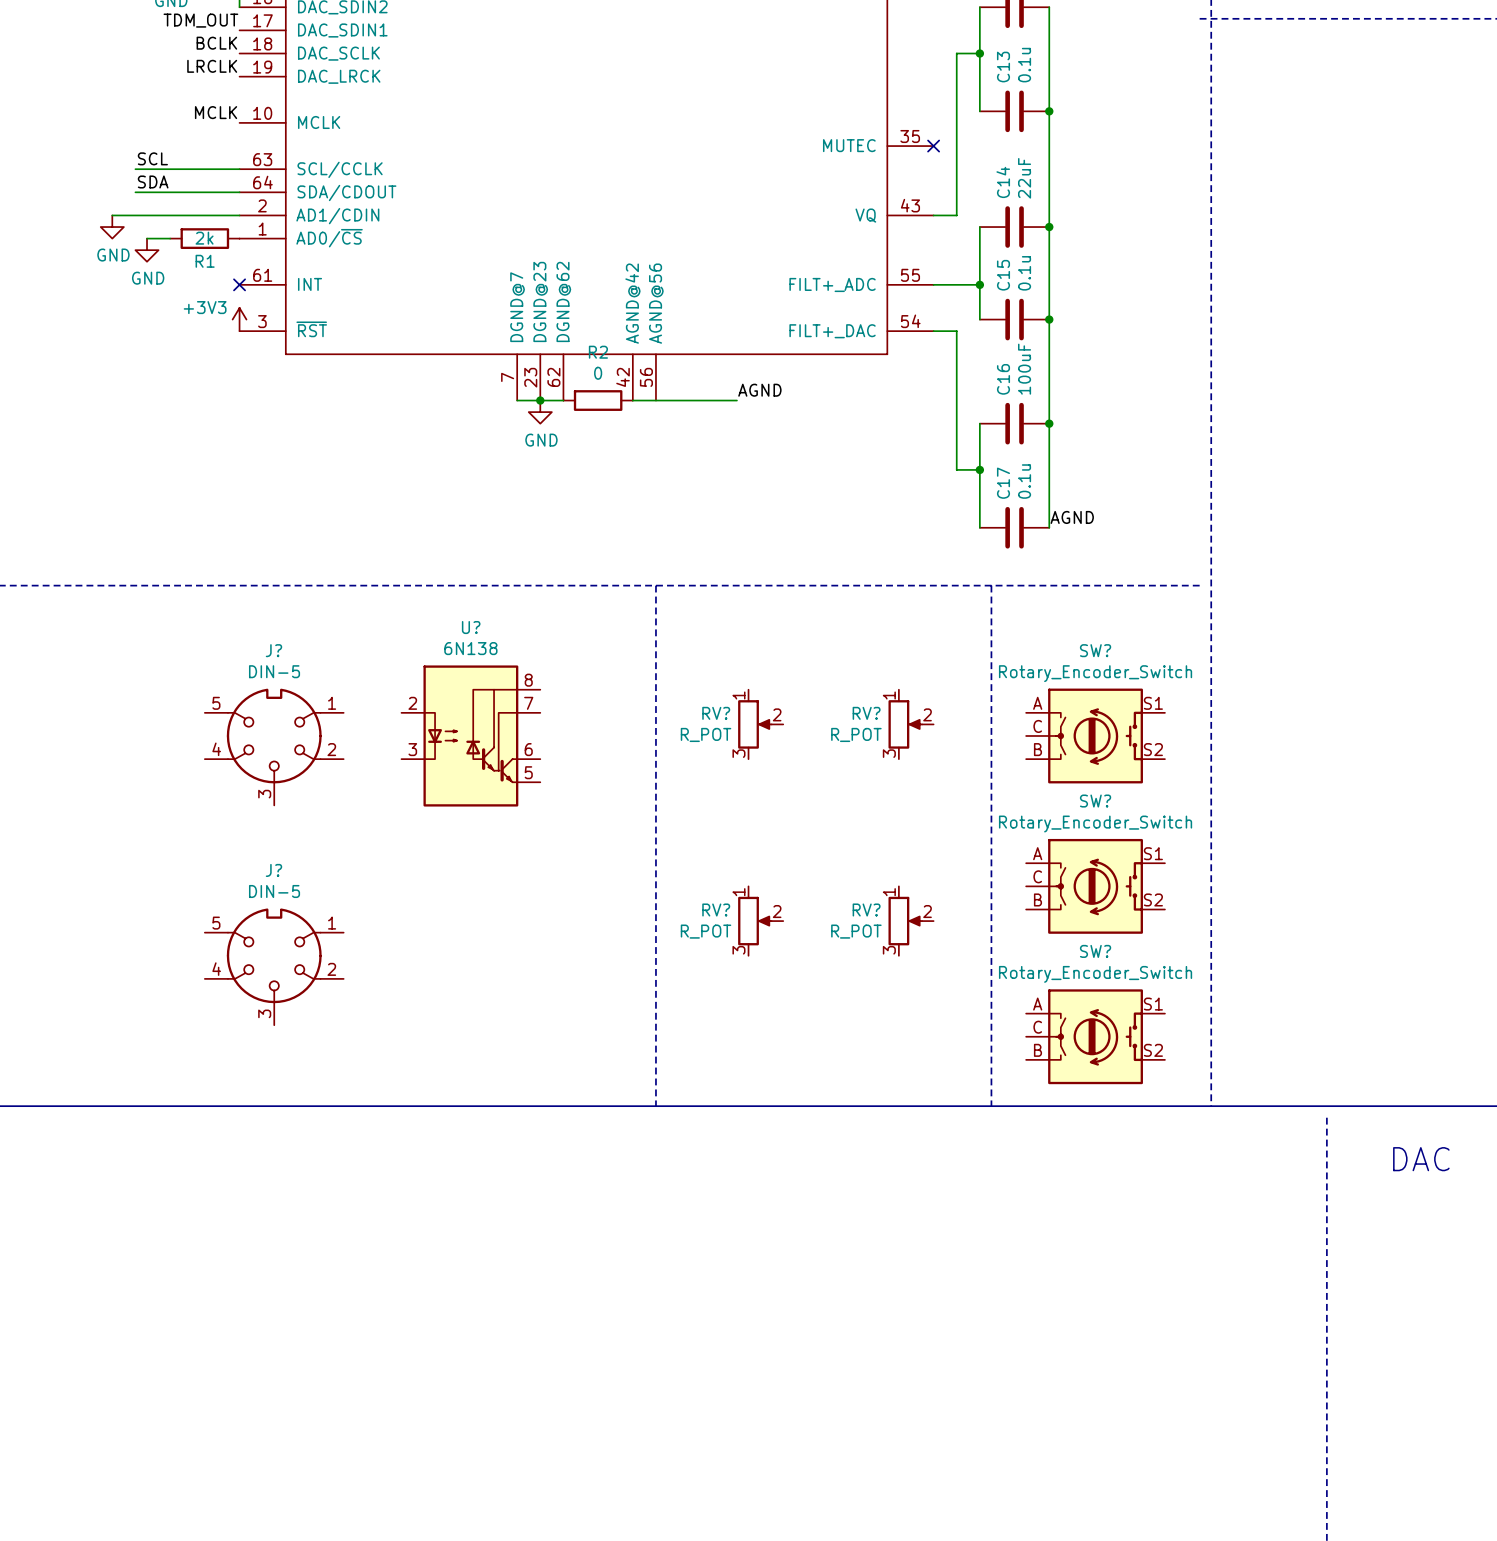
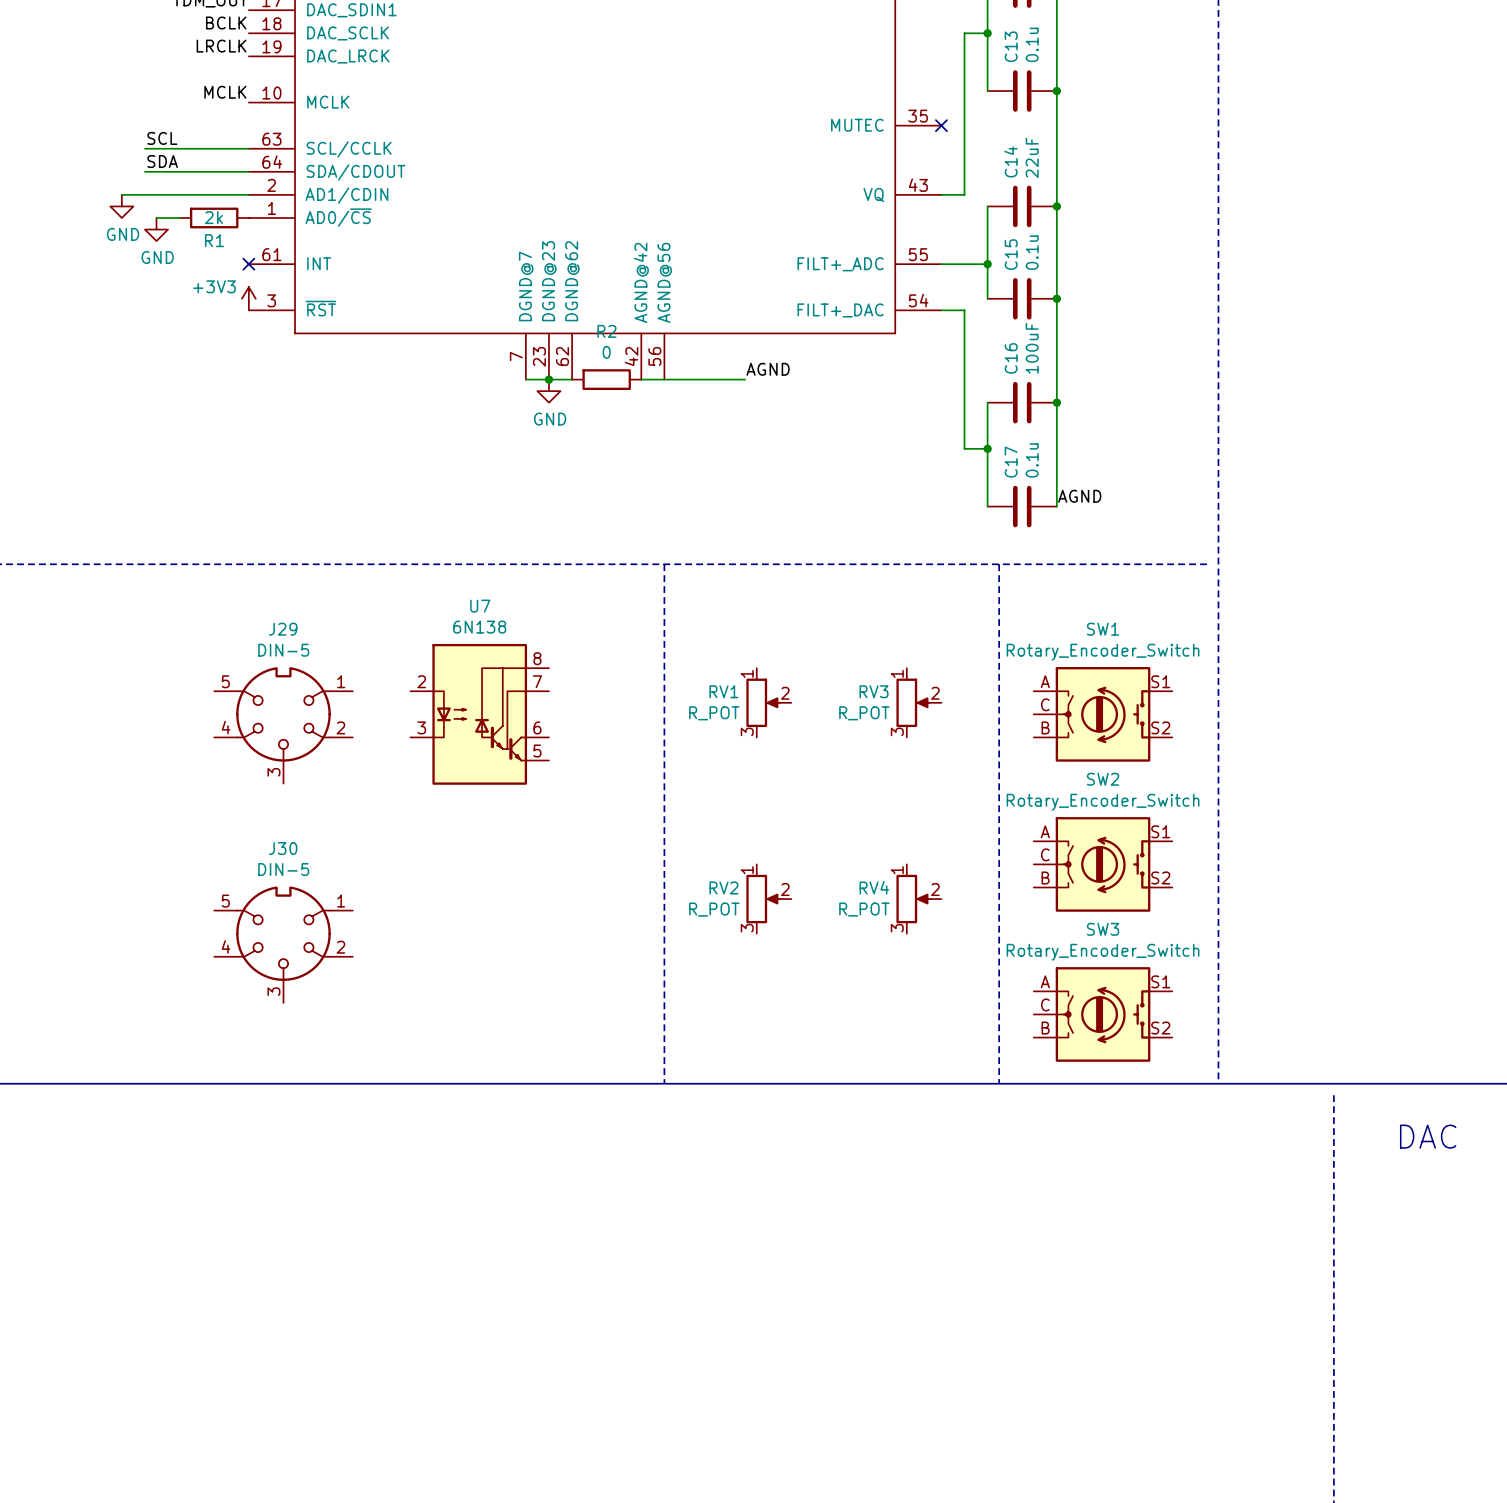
U? name: U? (471, 627) -> U7 (480, 606)
J? name: J? (273, 650) -> J29 (283, 629)
SW? name: SW? (1095, 650) -> SW1 (1103, 629)
RV? name: RV? (716, 713) -> RV1 (723, 691)
RV? name: RV? (866, 713) -> RV3 (874, 691)
SW? name: SW? (1095, 801) -> SW2 (1103, 779)
J? name: J? (273, 870) -> J30 (283, 848)
RV? name: RV? (716, 910) -> RV2 (723, 887)
RV? name: RV? (866, 910) -> RV4 (874, 887)
SW? name: SW? (1095, 951) -> SW3 (1103, 929)

